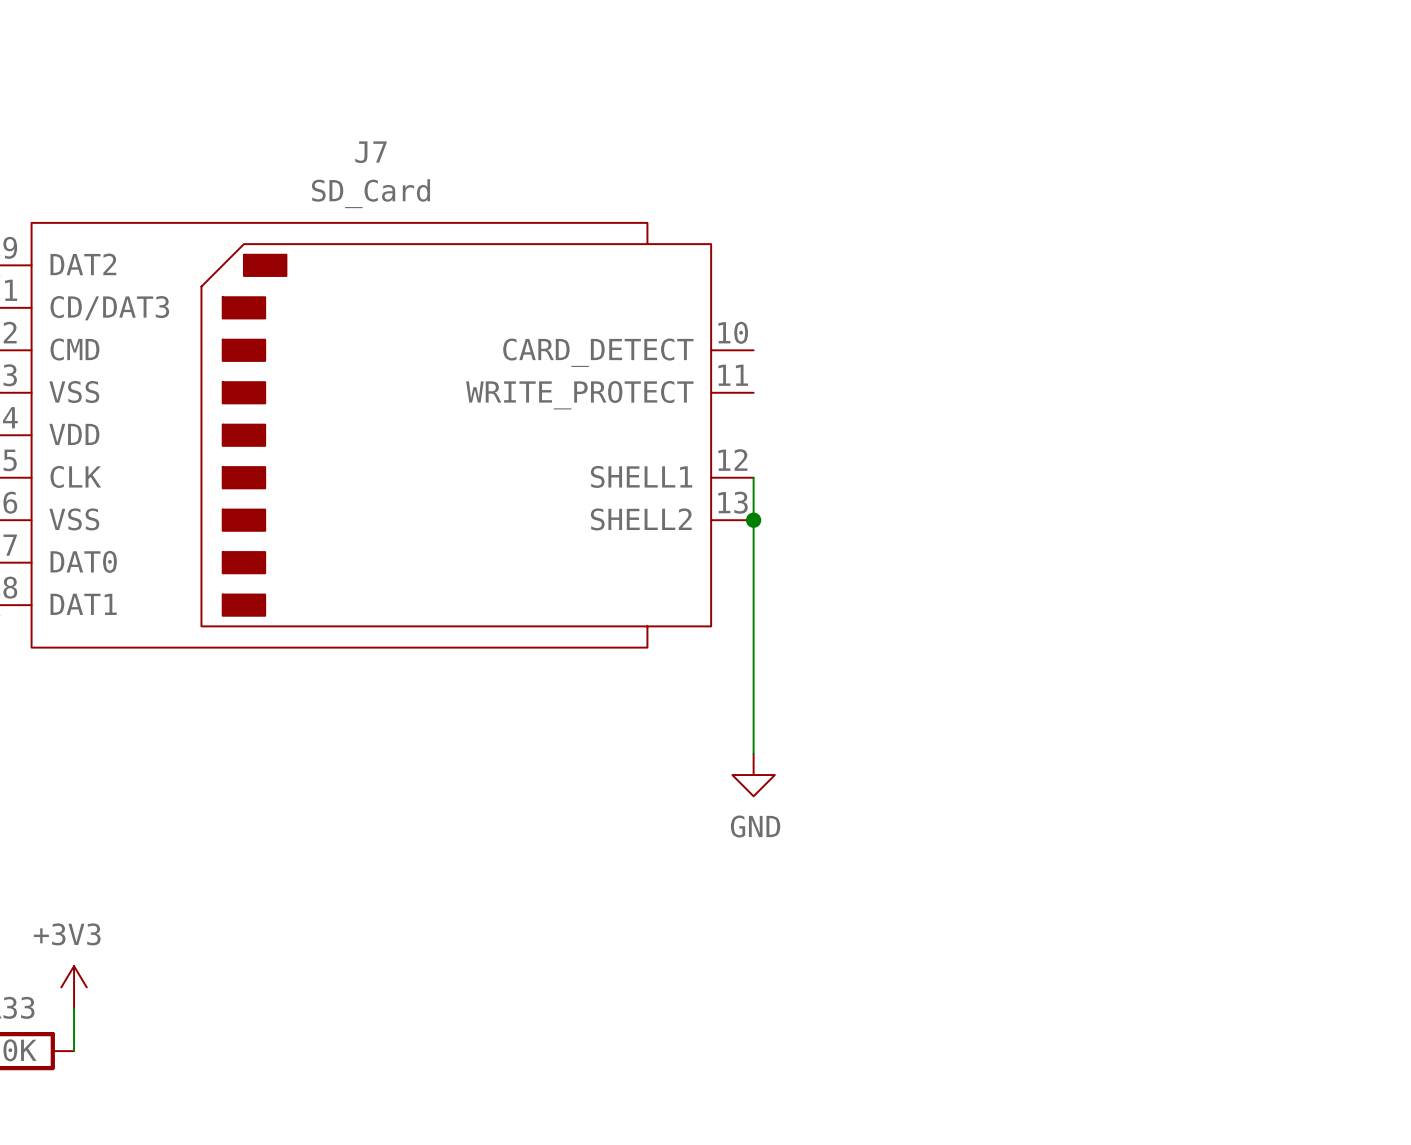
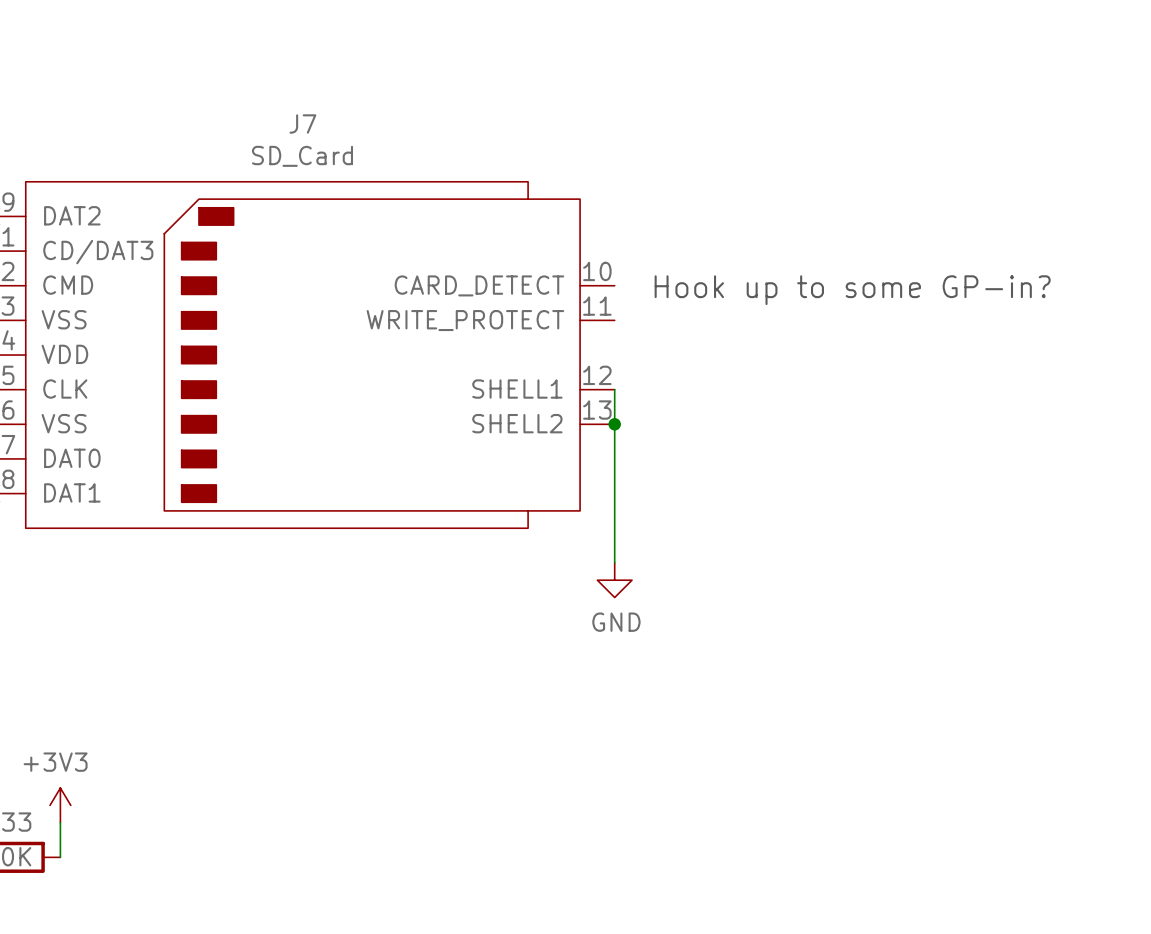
text: none -> Hook up to some GP-in? (852, 290)
wire: (753, 690) (753, 753) -> none
power symbol position: GND (753, 775) -> GND (614, 580)

